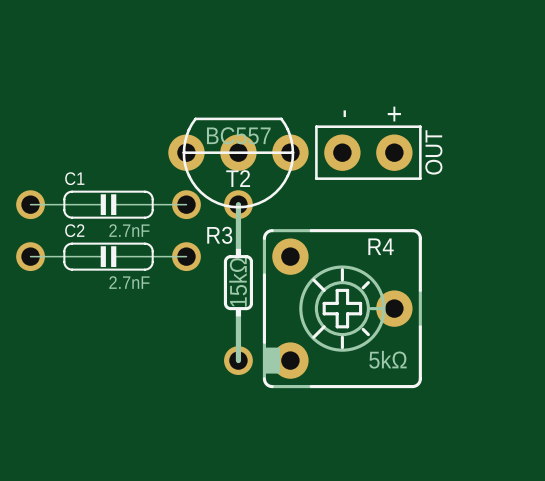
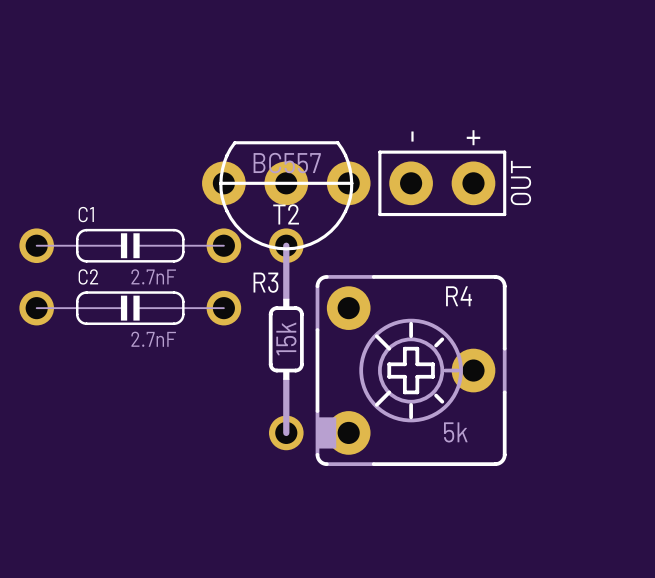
R3 value: 15kΩ (238, 282) -> 15k (286, 338)
R4 value: 5kΩ (387, 359) -> 5k (455, 432)

